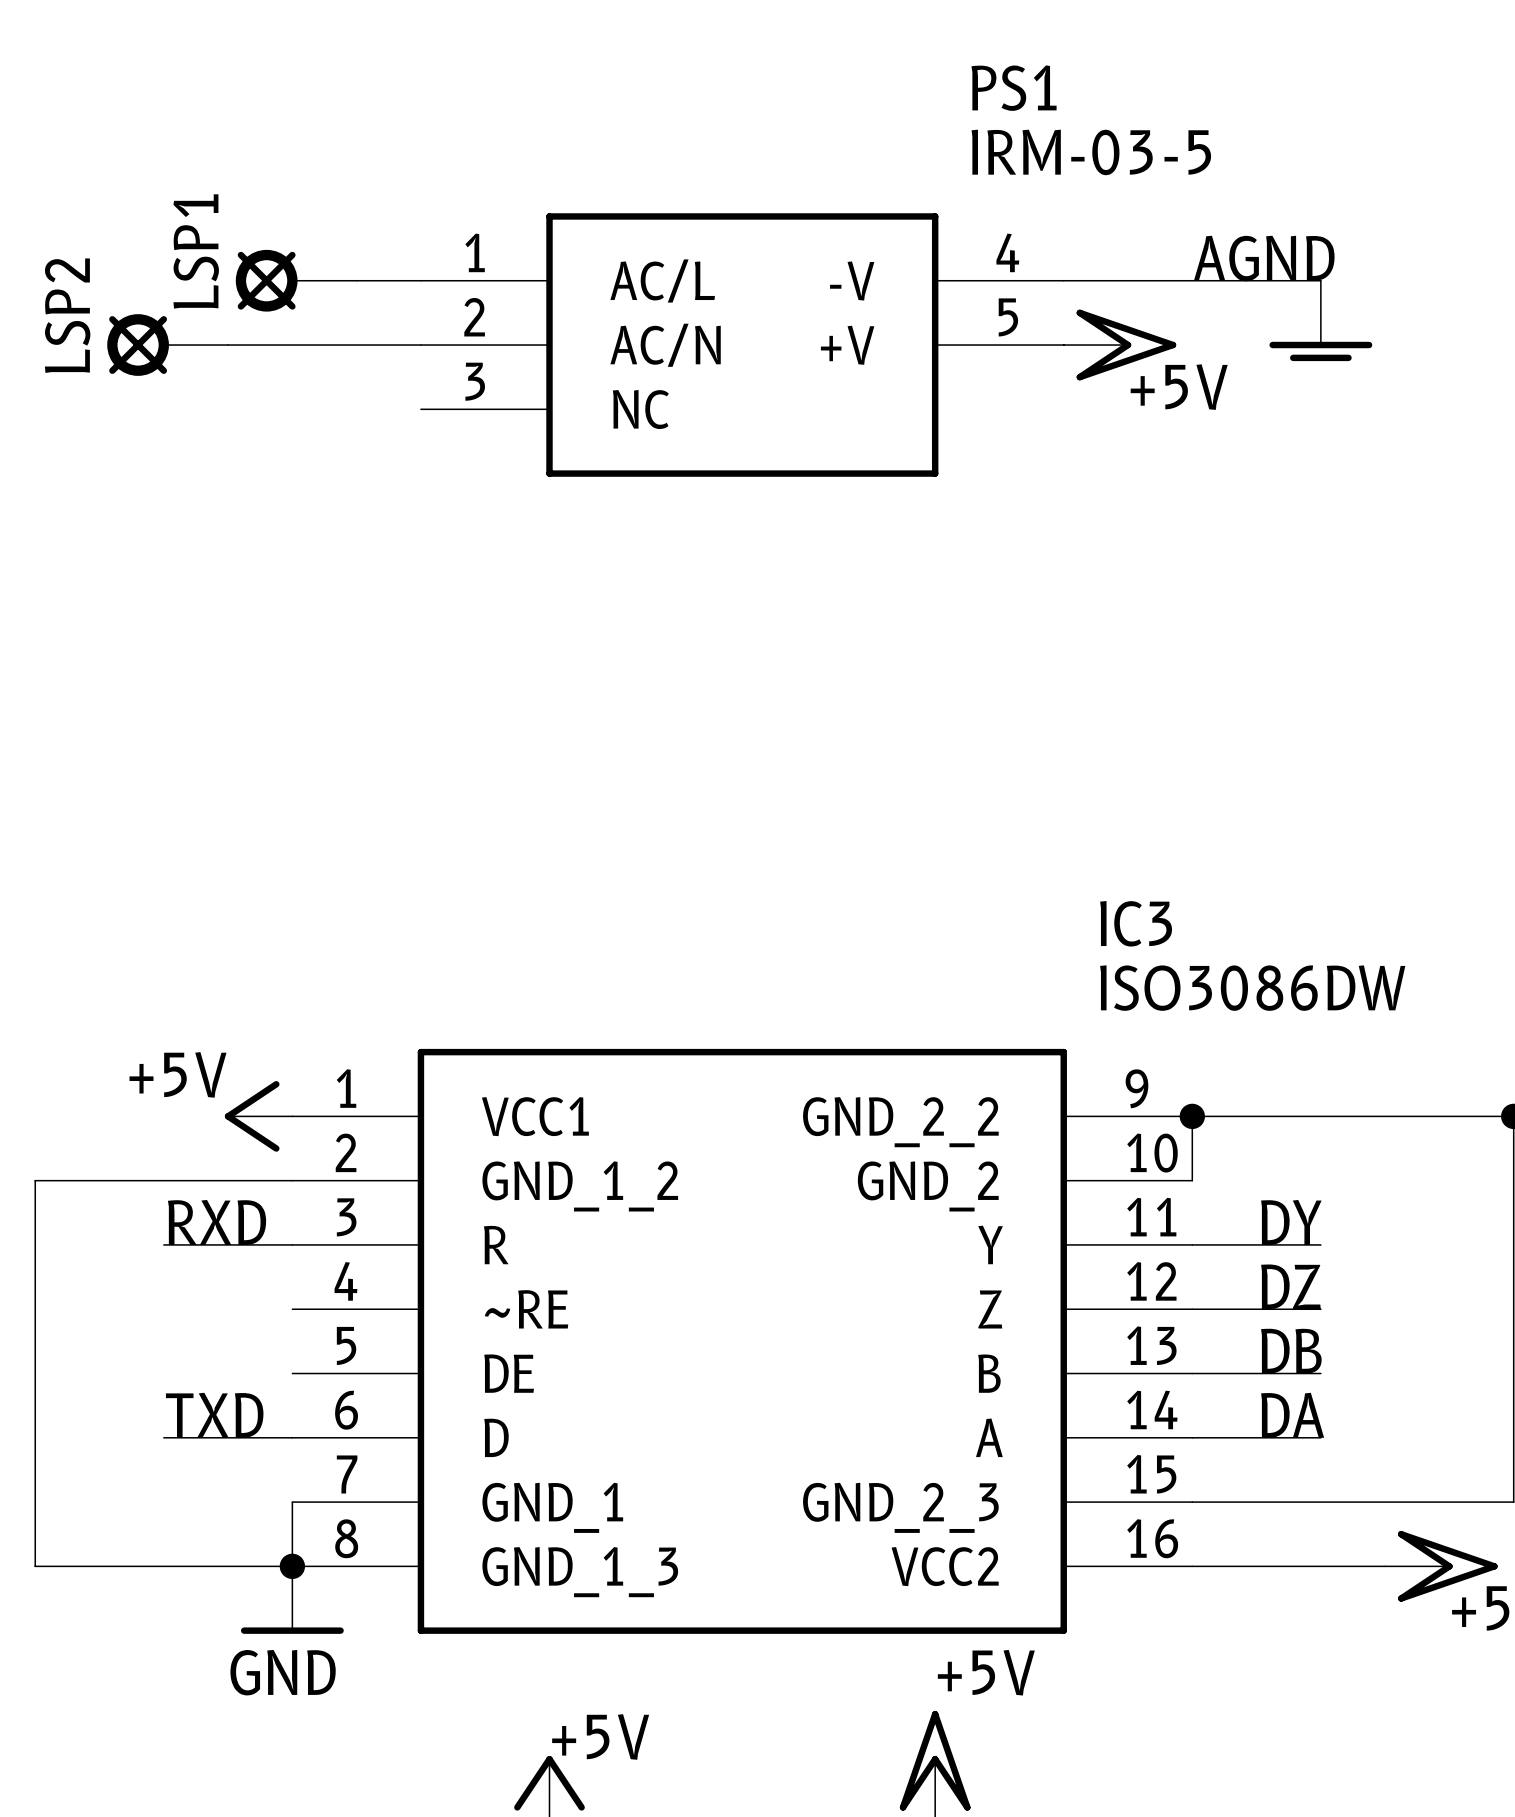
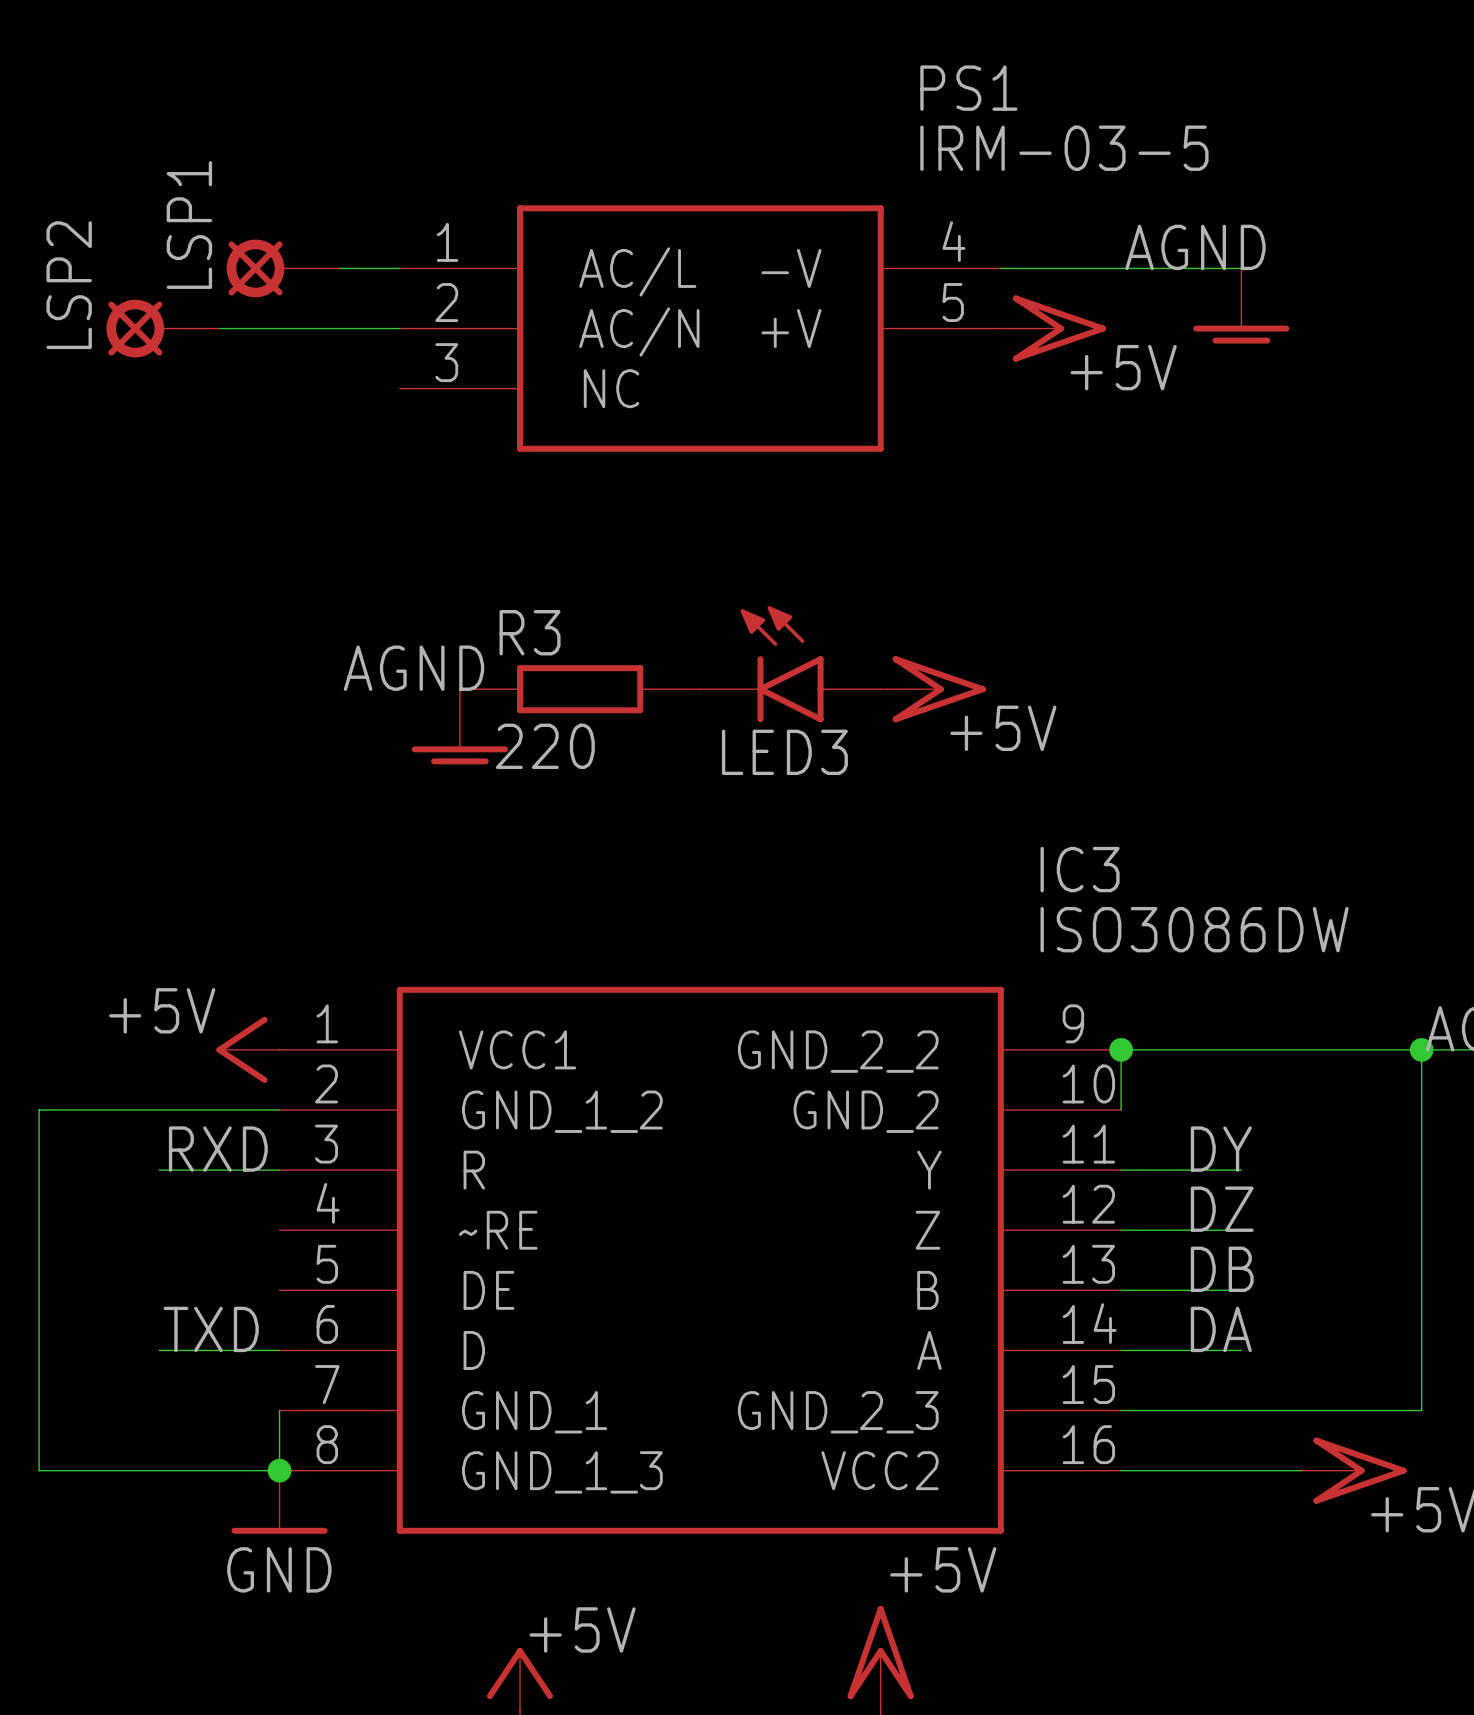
LED3: none -> (790, 664)
R3: none -> 220 (580, 689)
power symbol: none -> +5V (933, 689)
power symbol: none -> AGND (459, 726)

